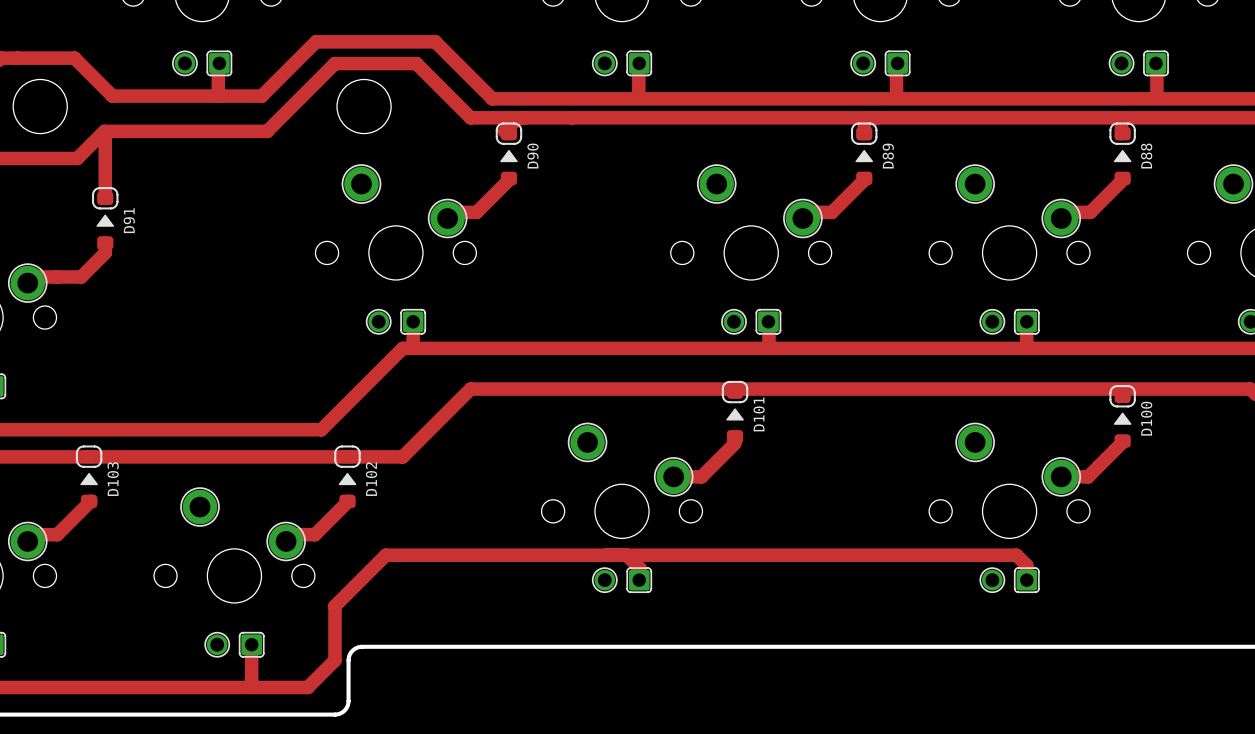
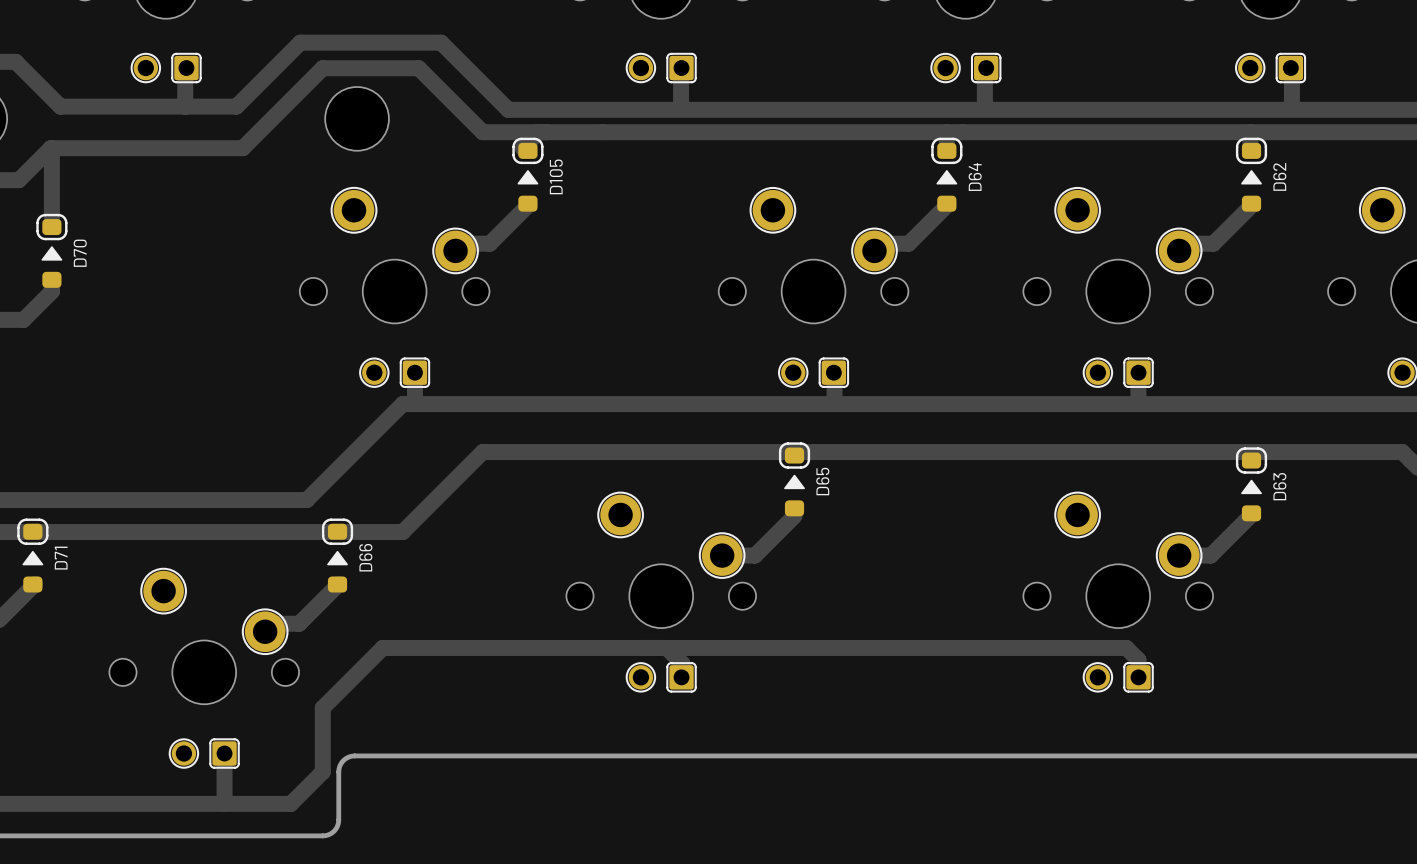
D90 name: D90 (532, 156) -> D105 (556, 176)
D89 name: D89 (888, 156) -> D64 (975, 176)
D88 name: D88 (1146, 156) -> D62 (1279, 176)
D91 name: D91 (129, 220) -> D70 (80, 253)
D101 name: D101 (759, 414) -> D65 (822, 481)
D100 name: D100 (1146, 418) -> D63 (1279, 486)
D103 name: D103 (113, 479) -> D71 (61, 558)
D102 name: D102 (371, 479) -> D66 (365, 557)

